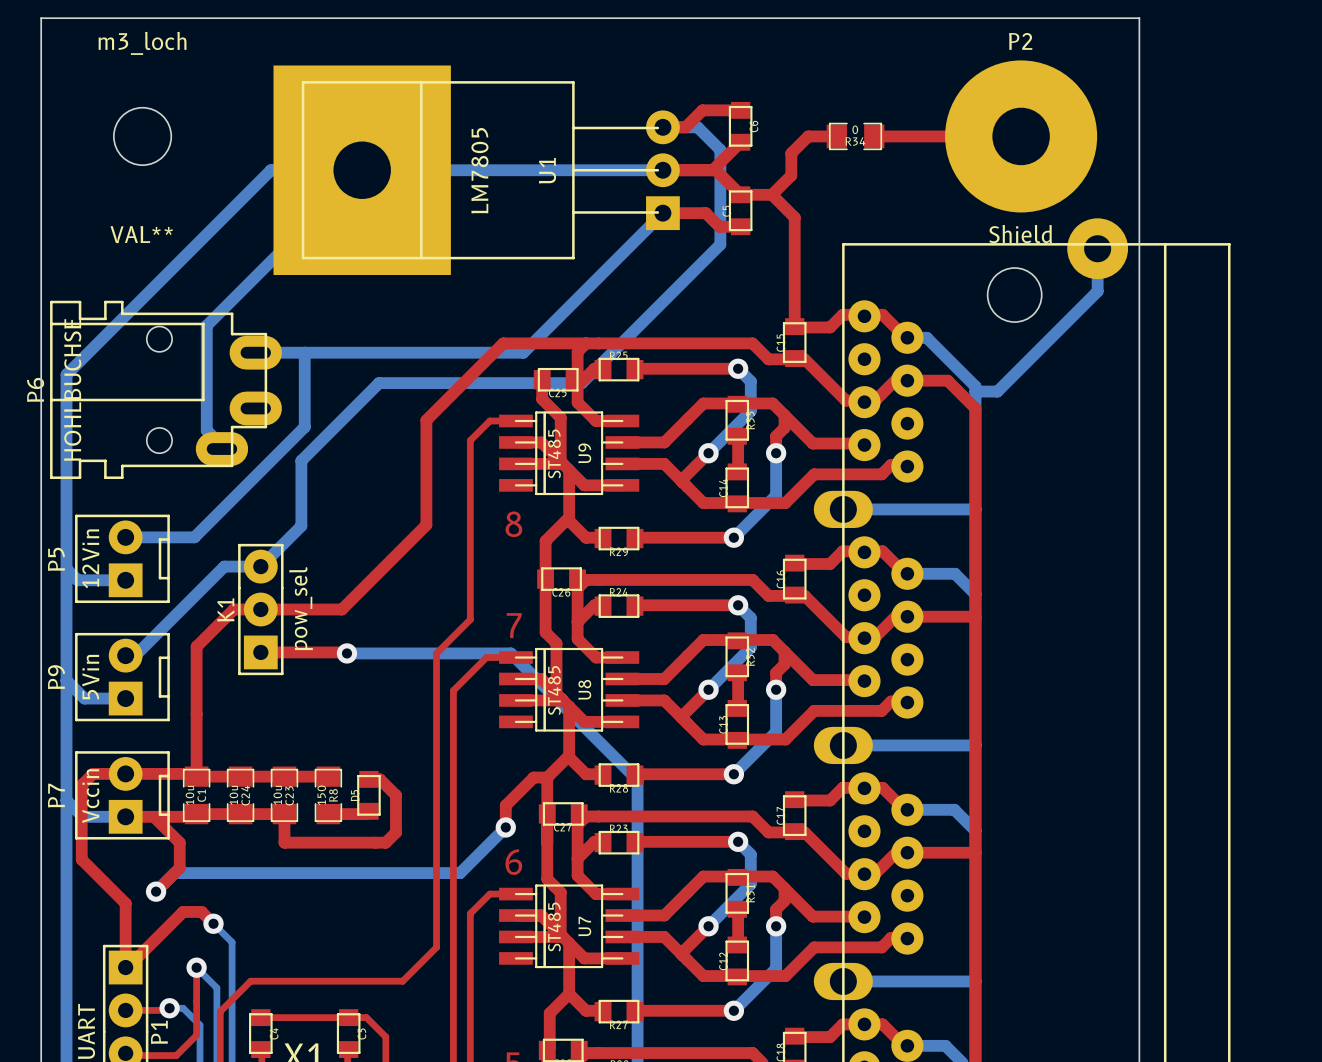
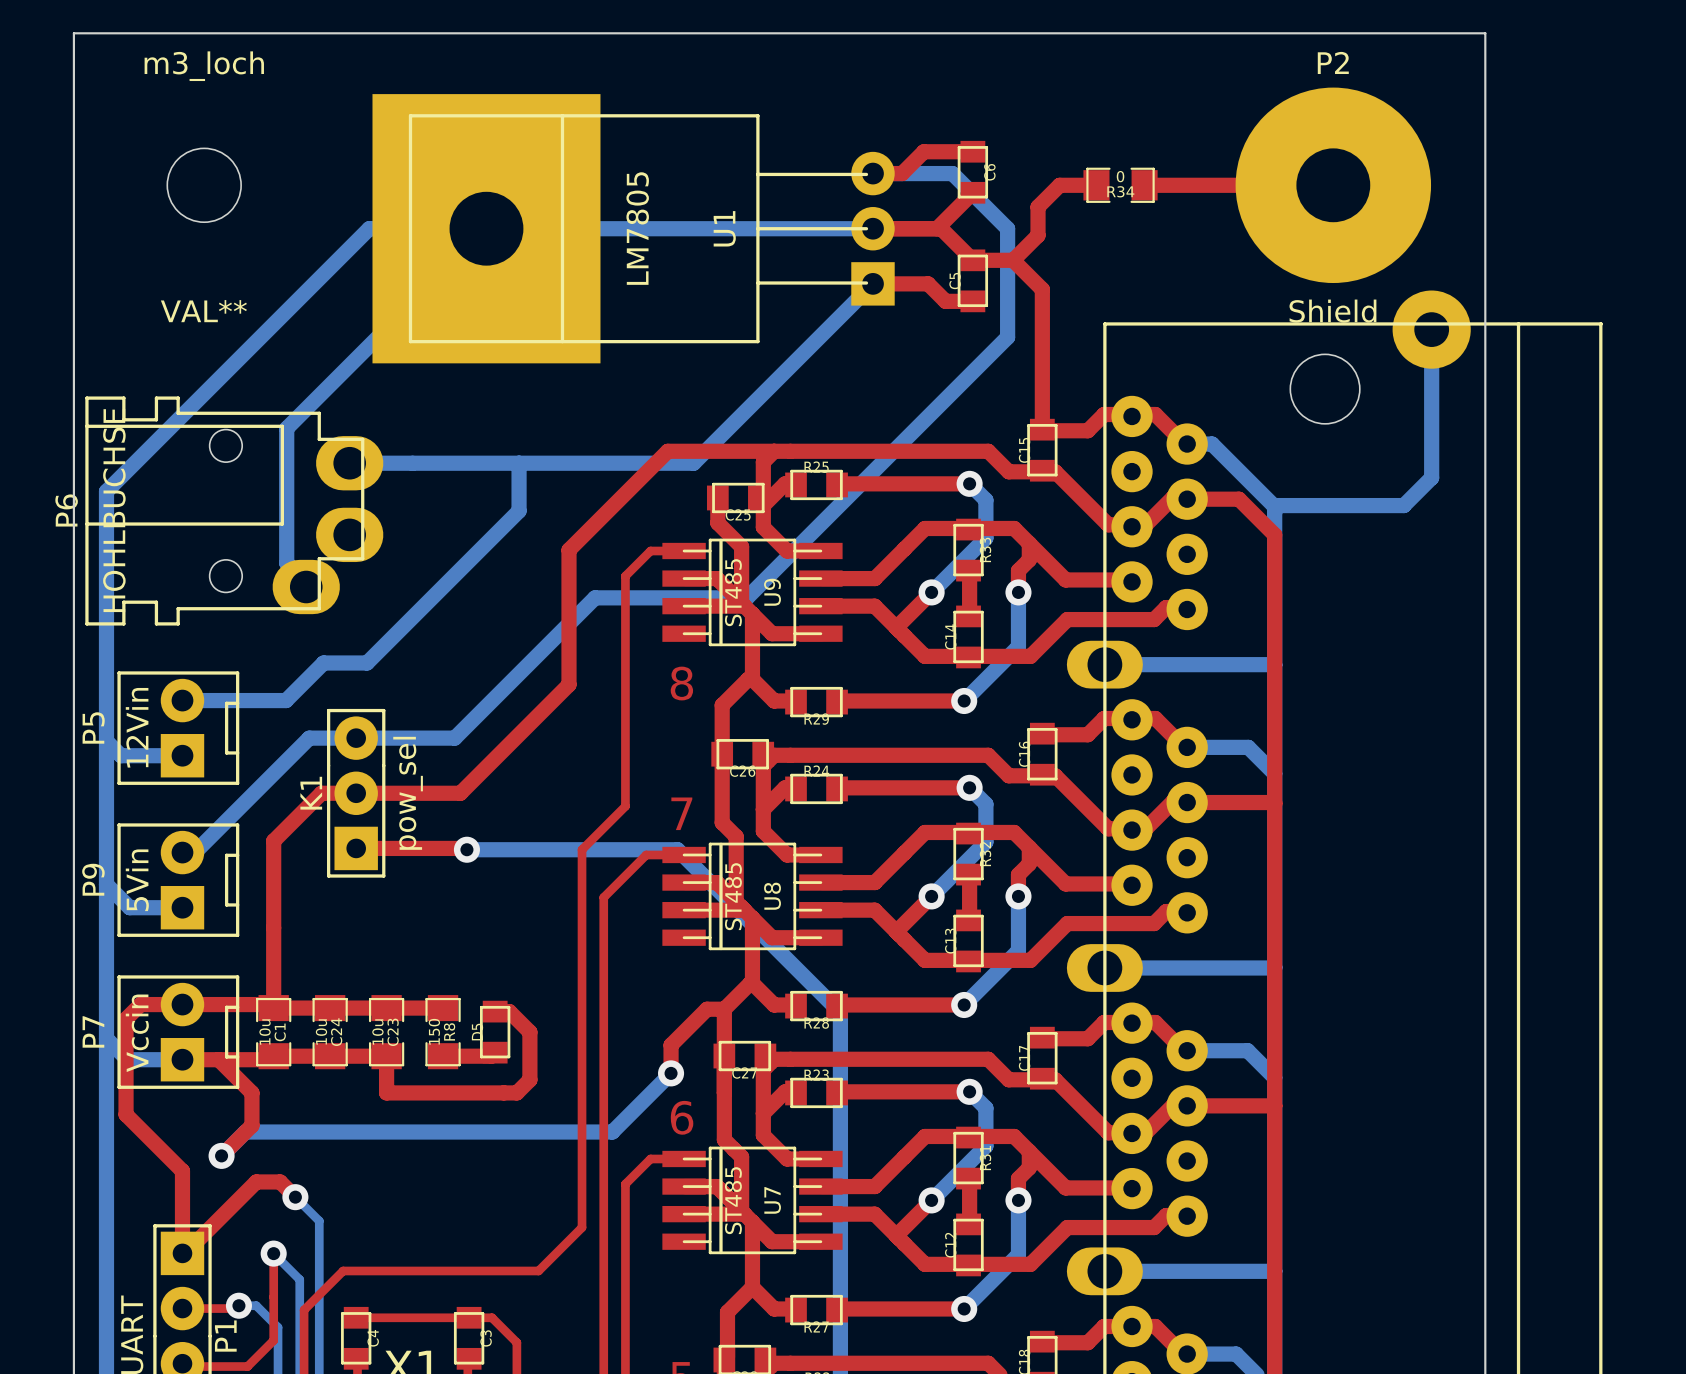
bottom track: (697, 127) (720, 149) (720, 244) (581, 383) (379, 383) (301, 460) (301, 526) (260, 566) -> (917, 173) (952, 173) (1007, 228) (1007, 337) (747, 597) (595, 597) (454, 738) (356, 738)
bottom track: (1097, 291) (997, 391) (975, 391) -> (1431, 384) (1431, 477) (1403, 505) (1273, 505)
P6 footprint: [50, 300, 282, 480] -> [85, 396, 384, 626]
bottom track: (304, 352) (304, 427) (194, 537) -> (519, 463) (519, 511) (367, 663) (323, 663) (286, 700) (270, 700)

